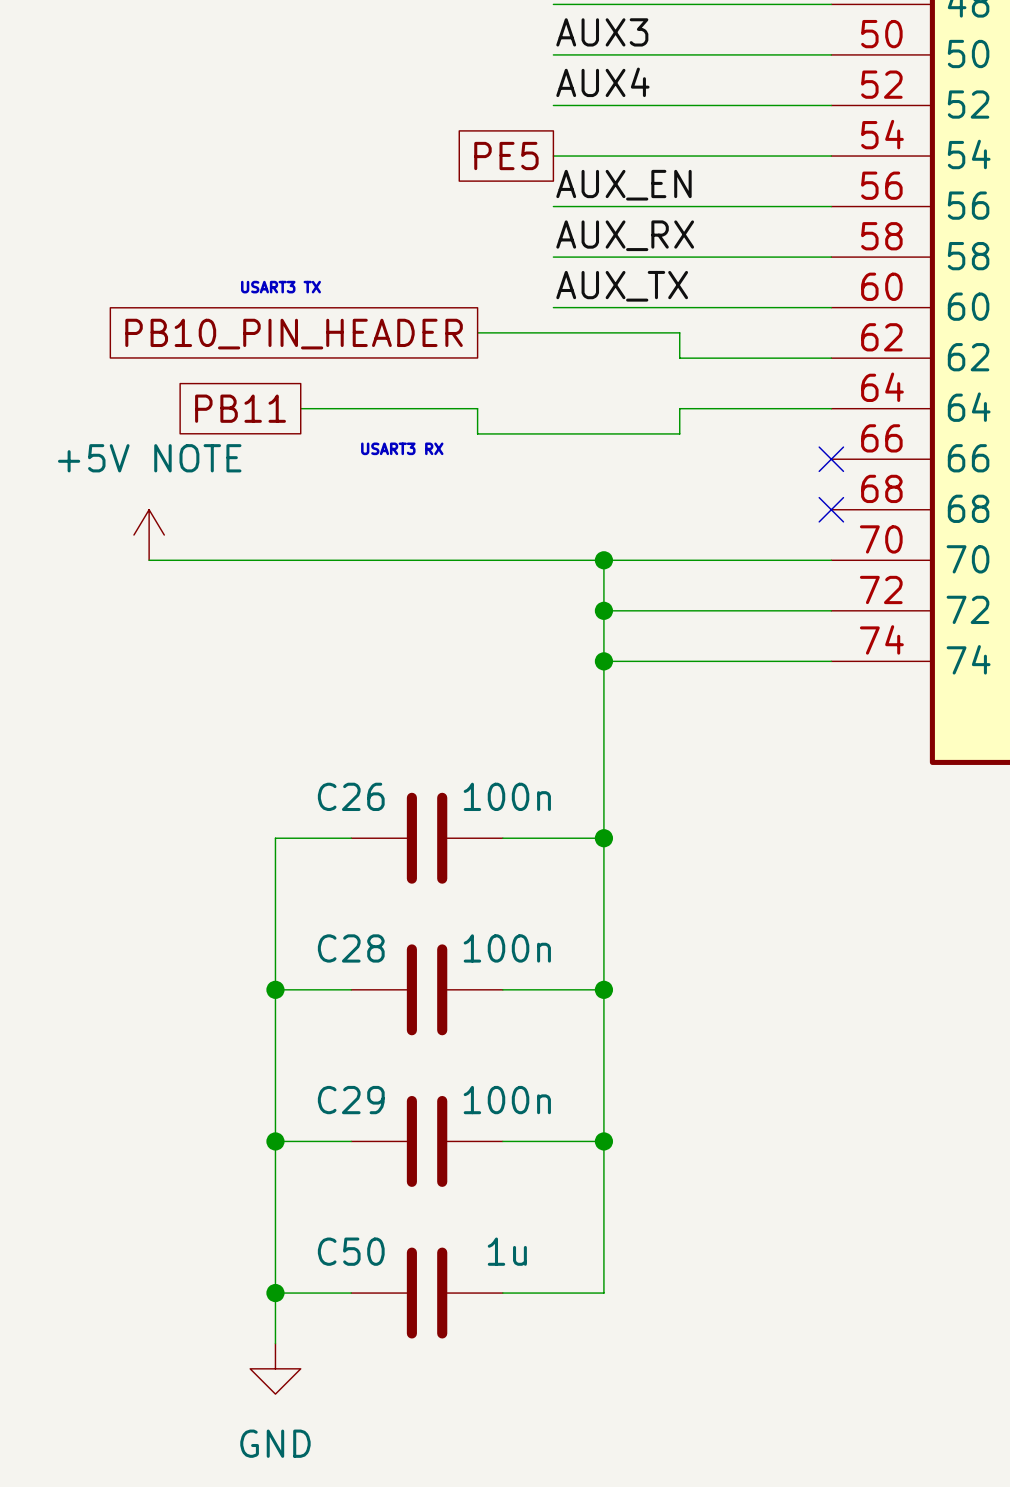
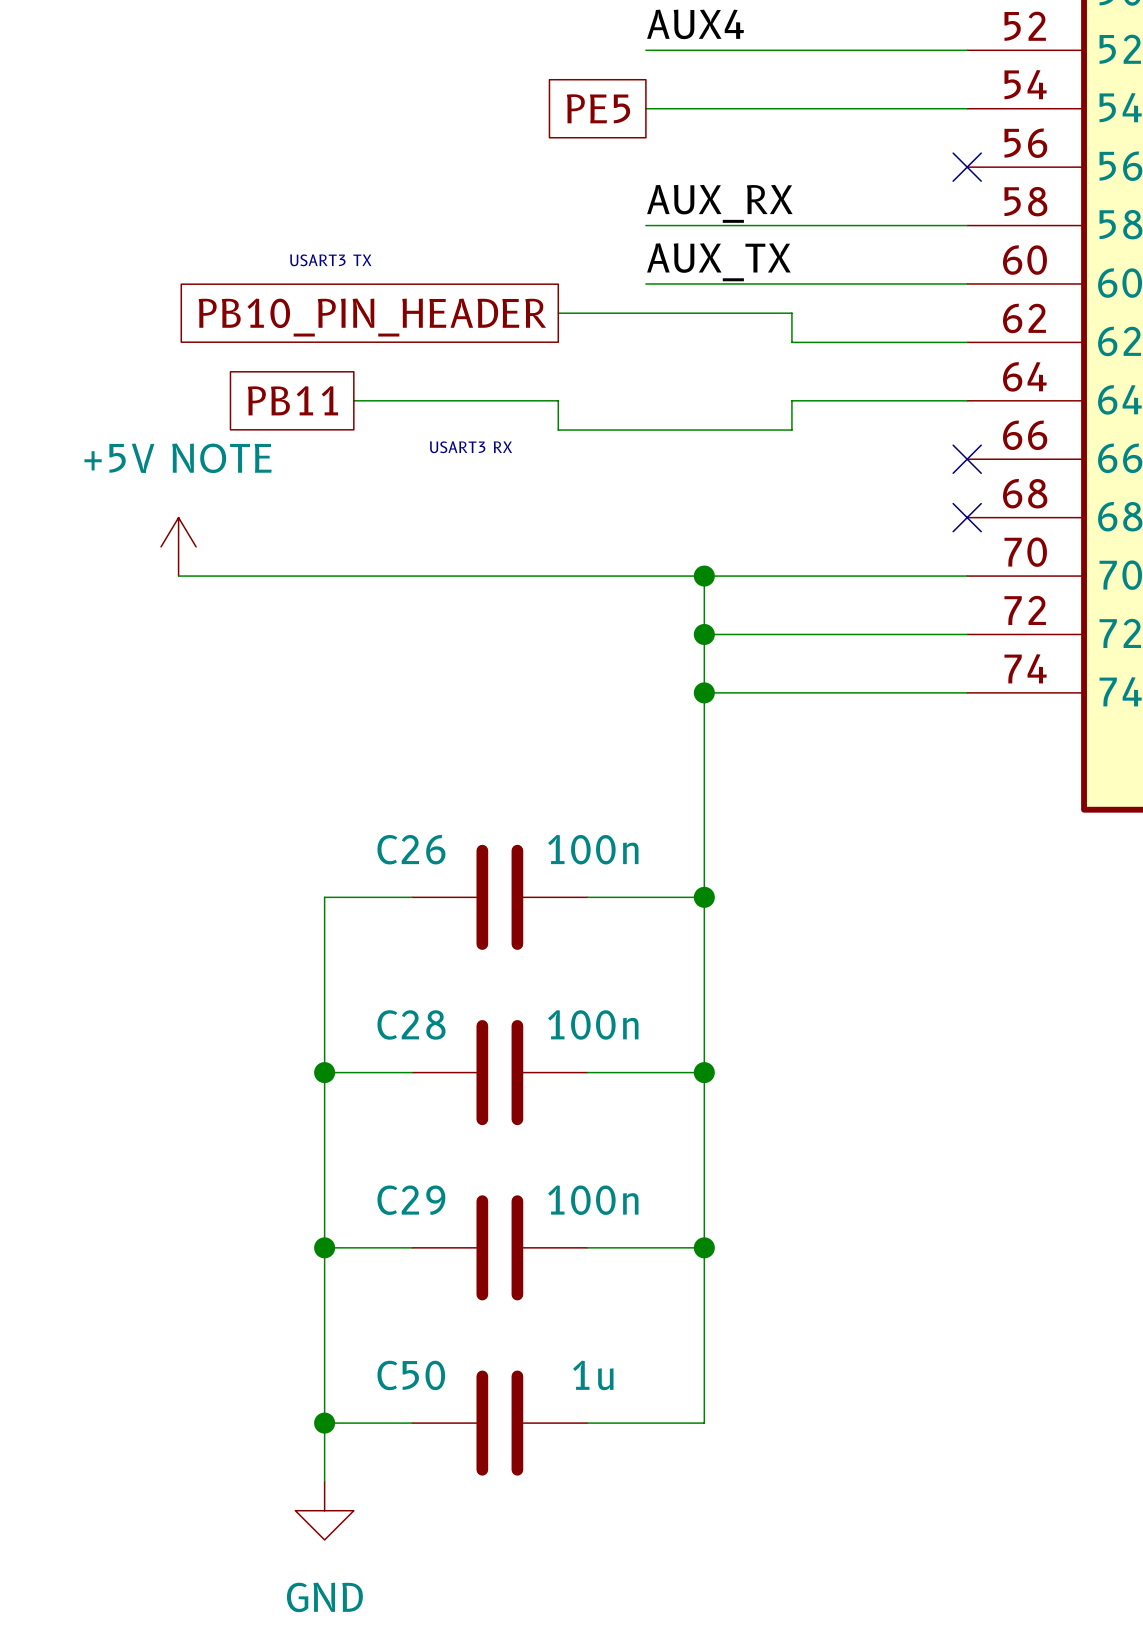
label: AUX_EN (623, 185) -> none
wire: (553, 206) (831, 206) -> none
no-connect mark: none -> (967, 167)

